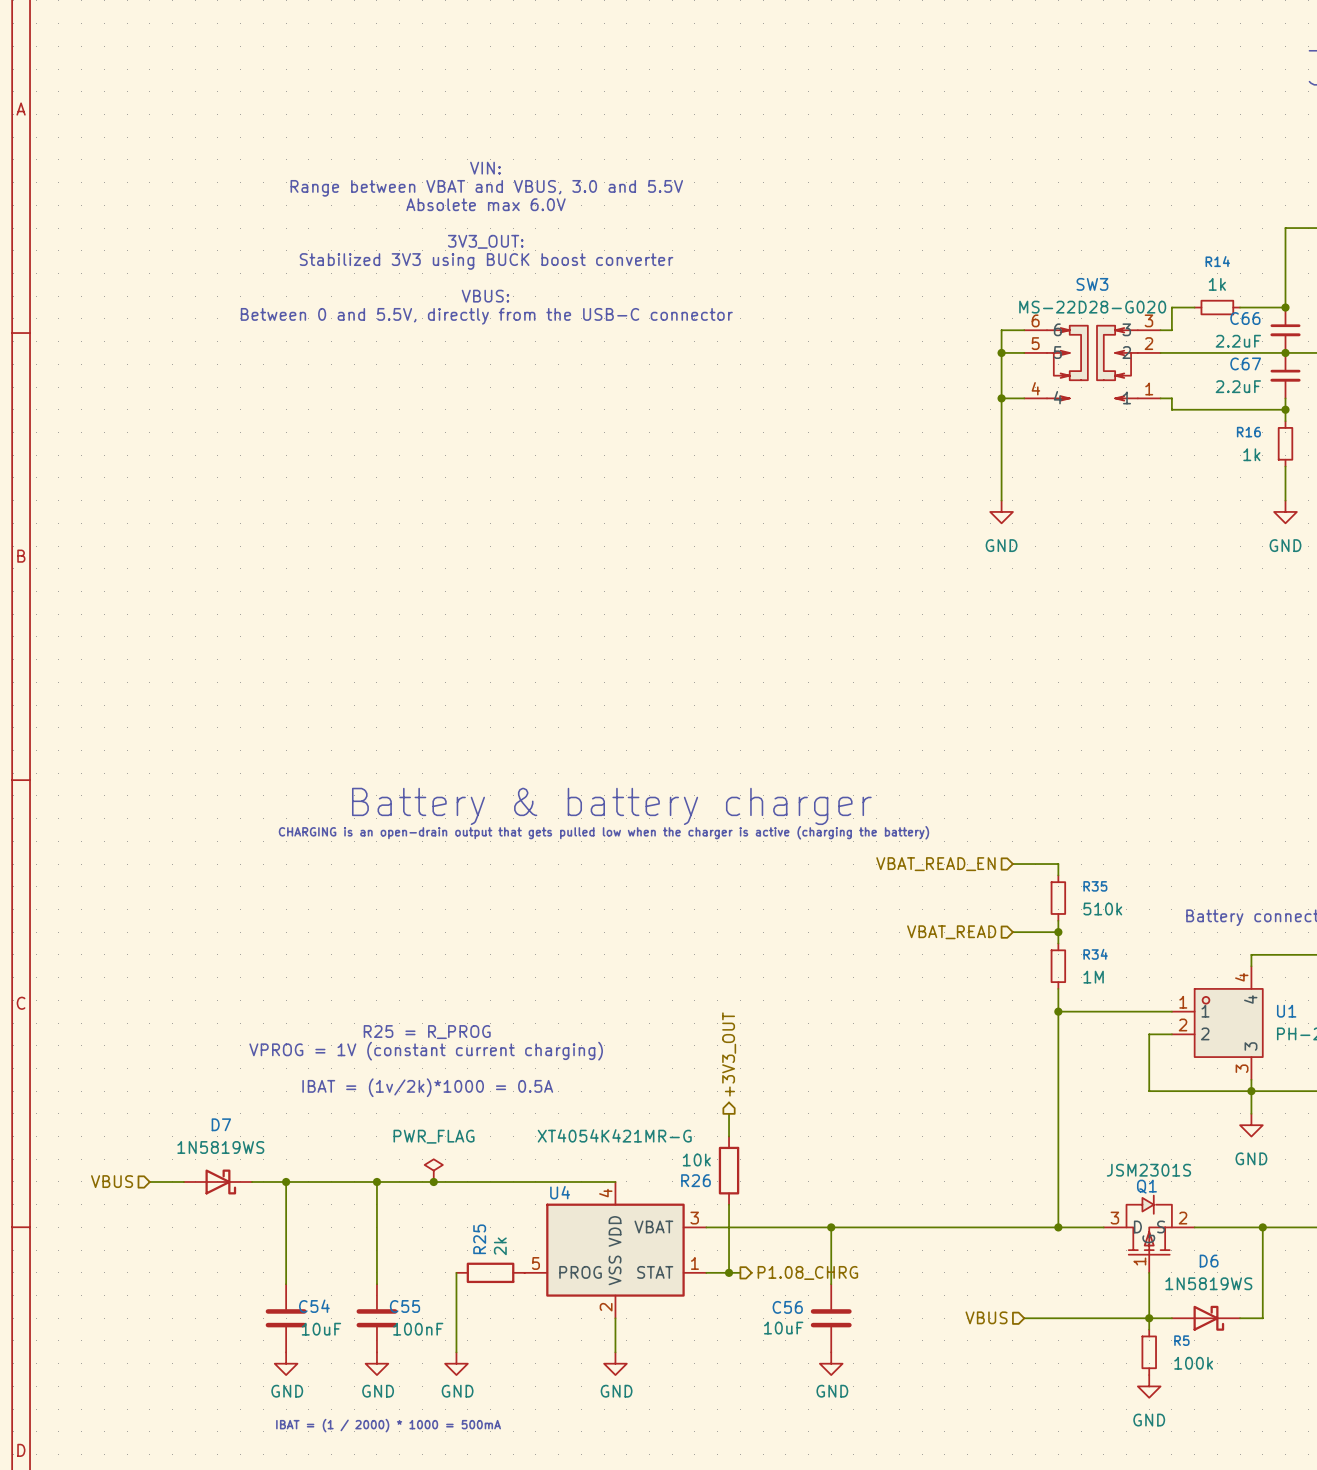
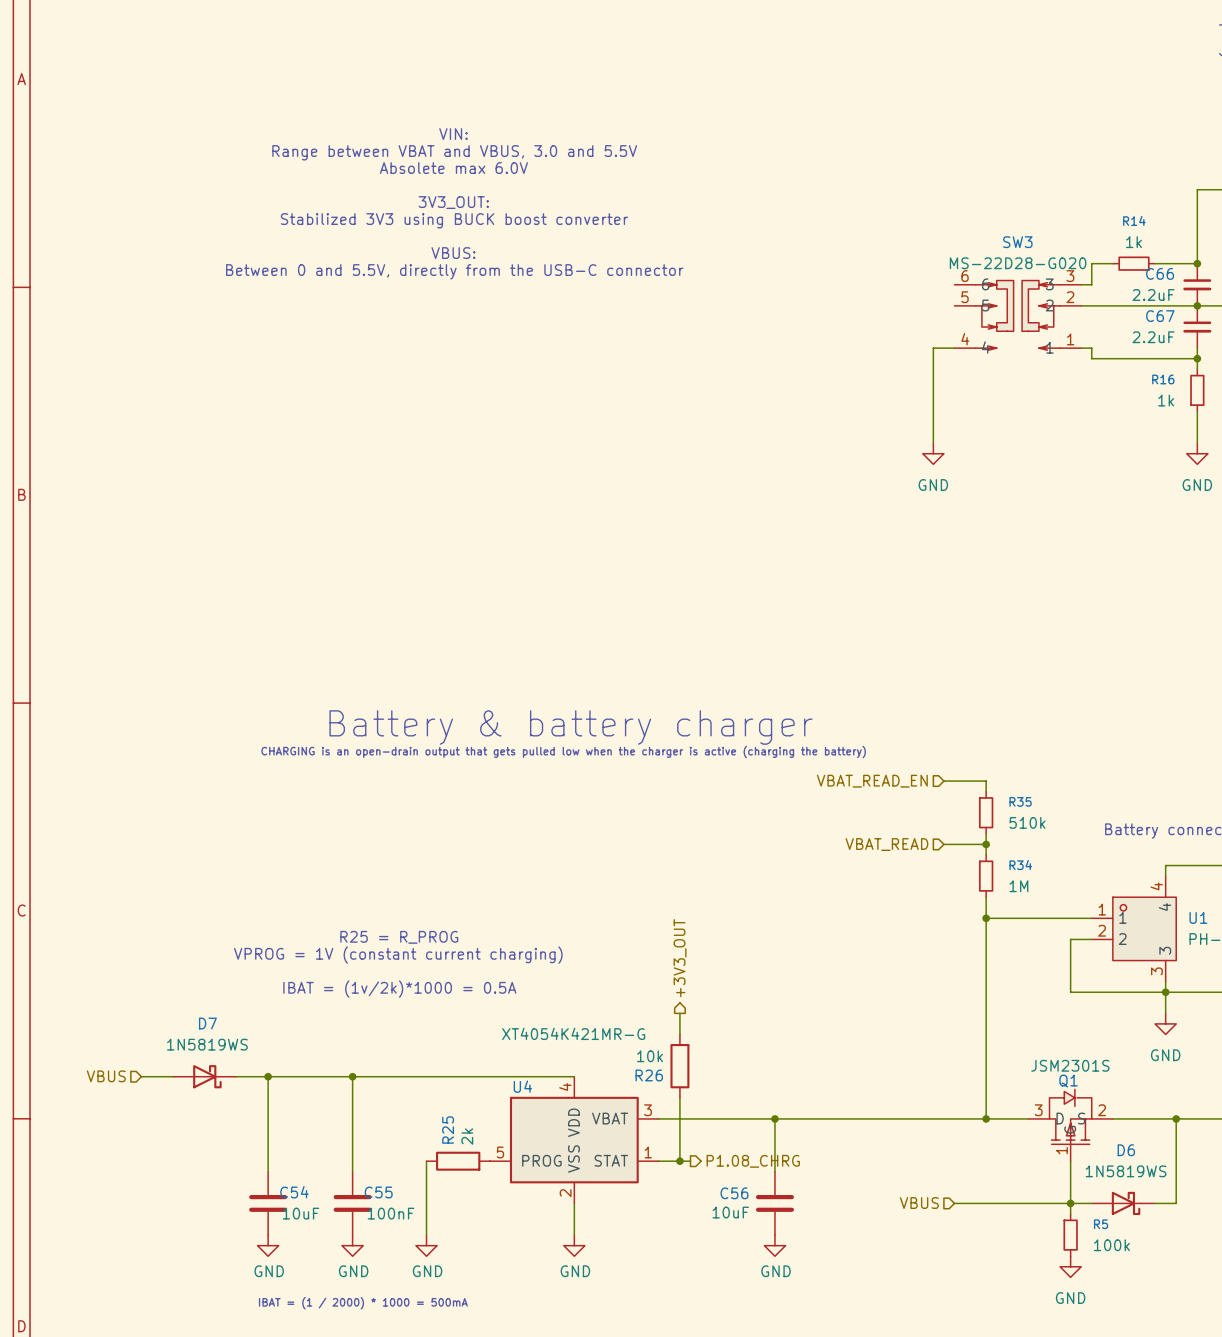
wire: (1024, 330) (1001, 330) (1001, 398) -> none
wire: (1001, 352) (1024, 352) -> none
junction: (1001, 352) -> none
junction: (1001, 398) -> none
power symbol: PWR_FLAG (433, 1170) -> none
junction: (433, 1181) -> none

